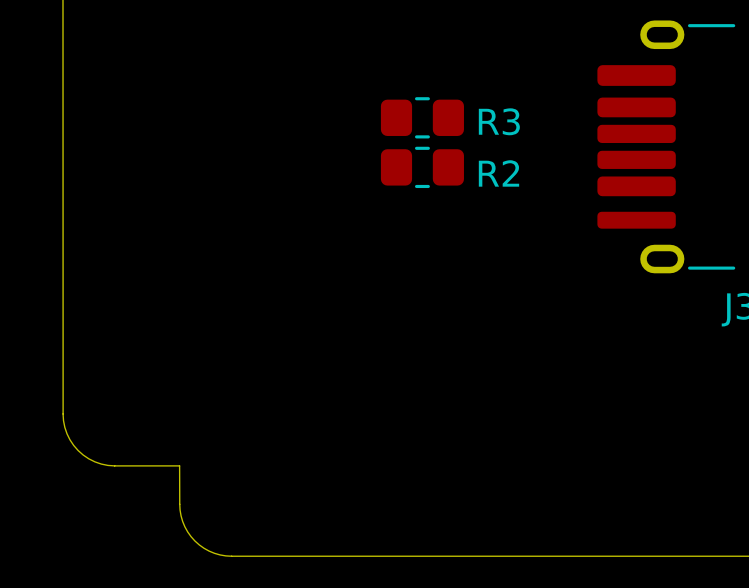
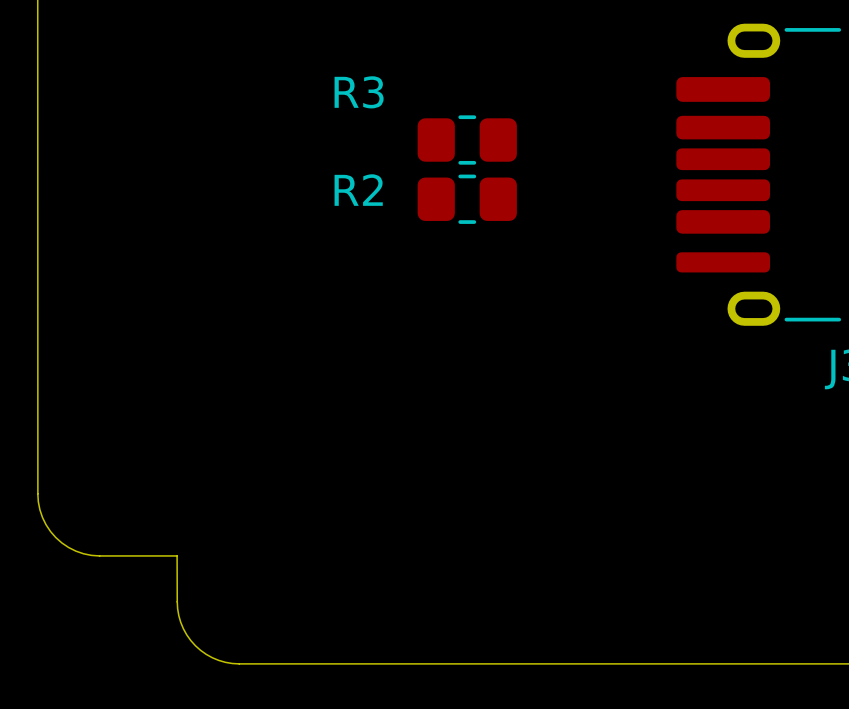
R3 name position: R3 (499, 121) -> R3 (359, 92)
R2 name position: R2 (498, 173) -> R2 (358, 190)

